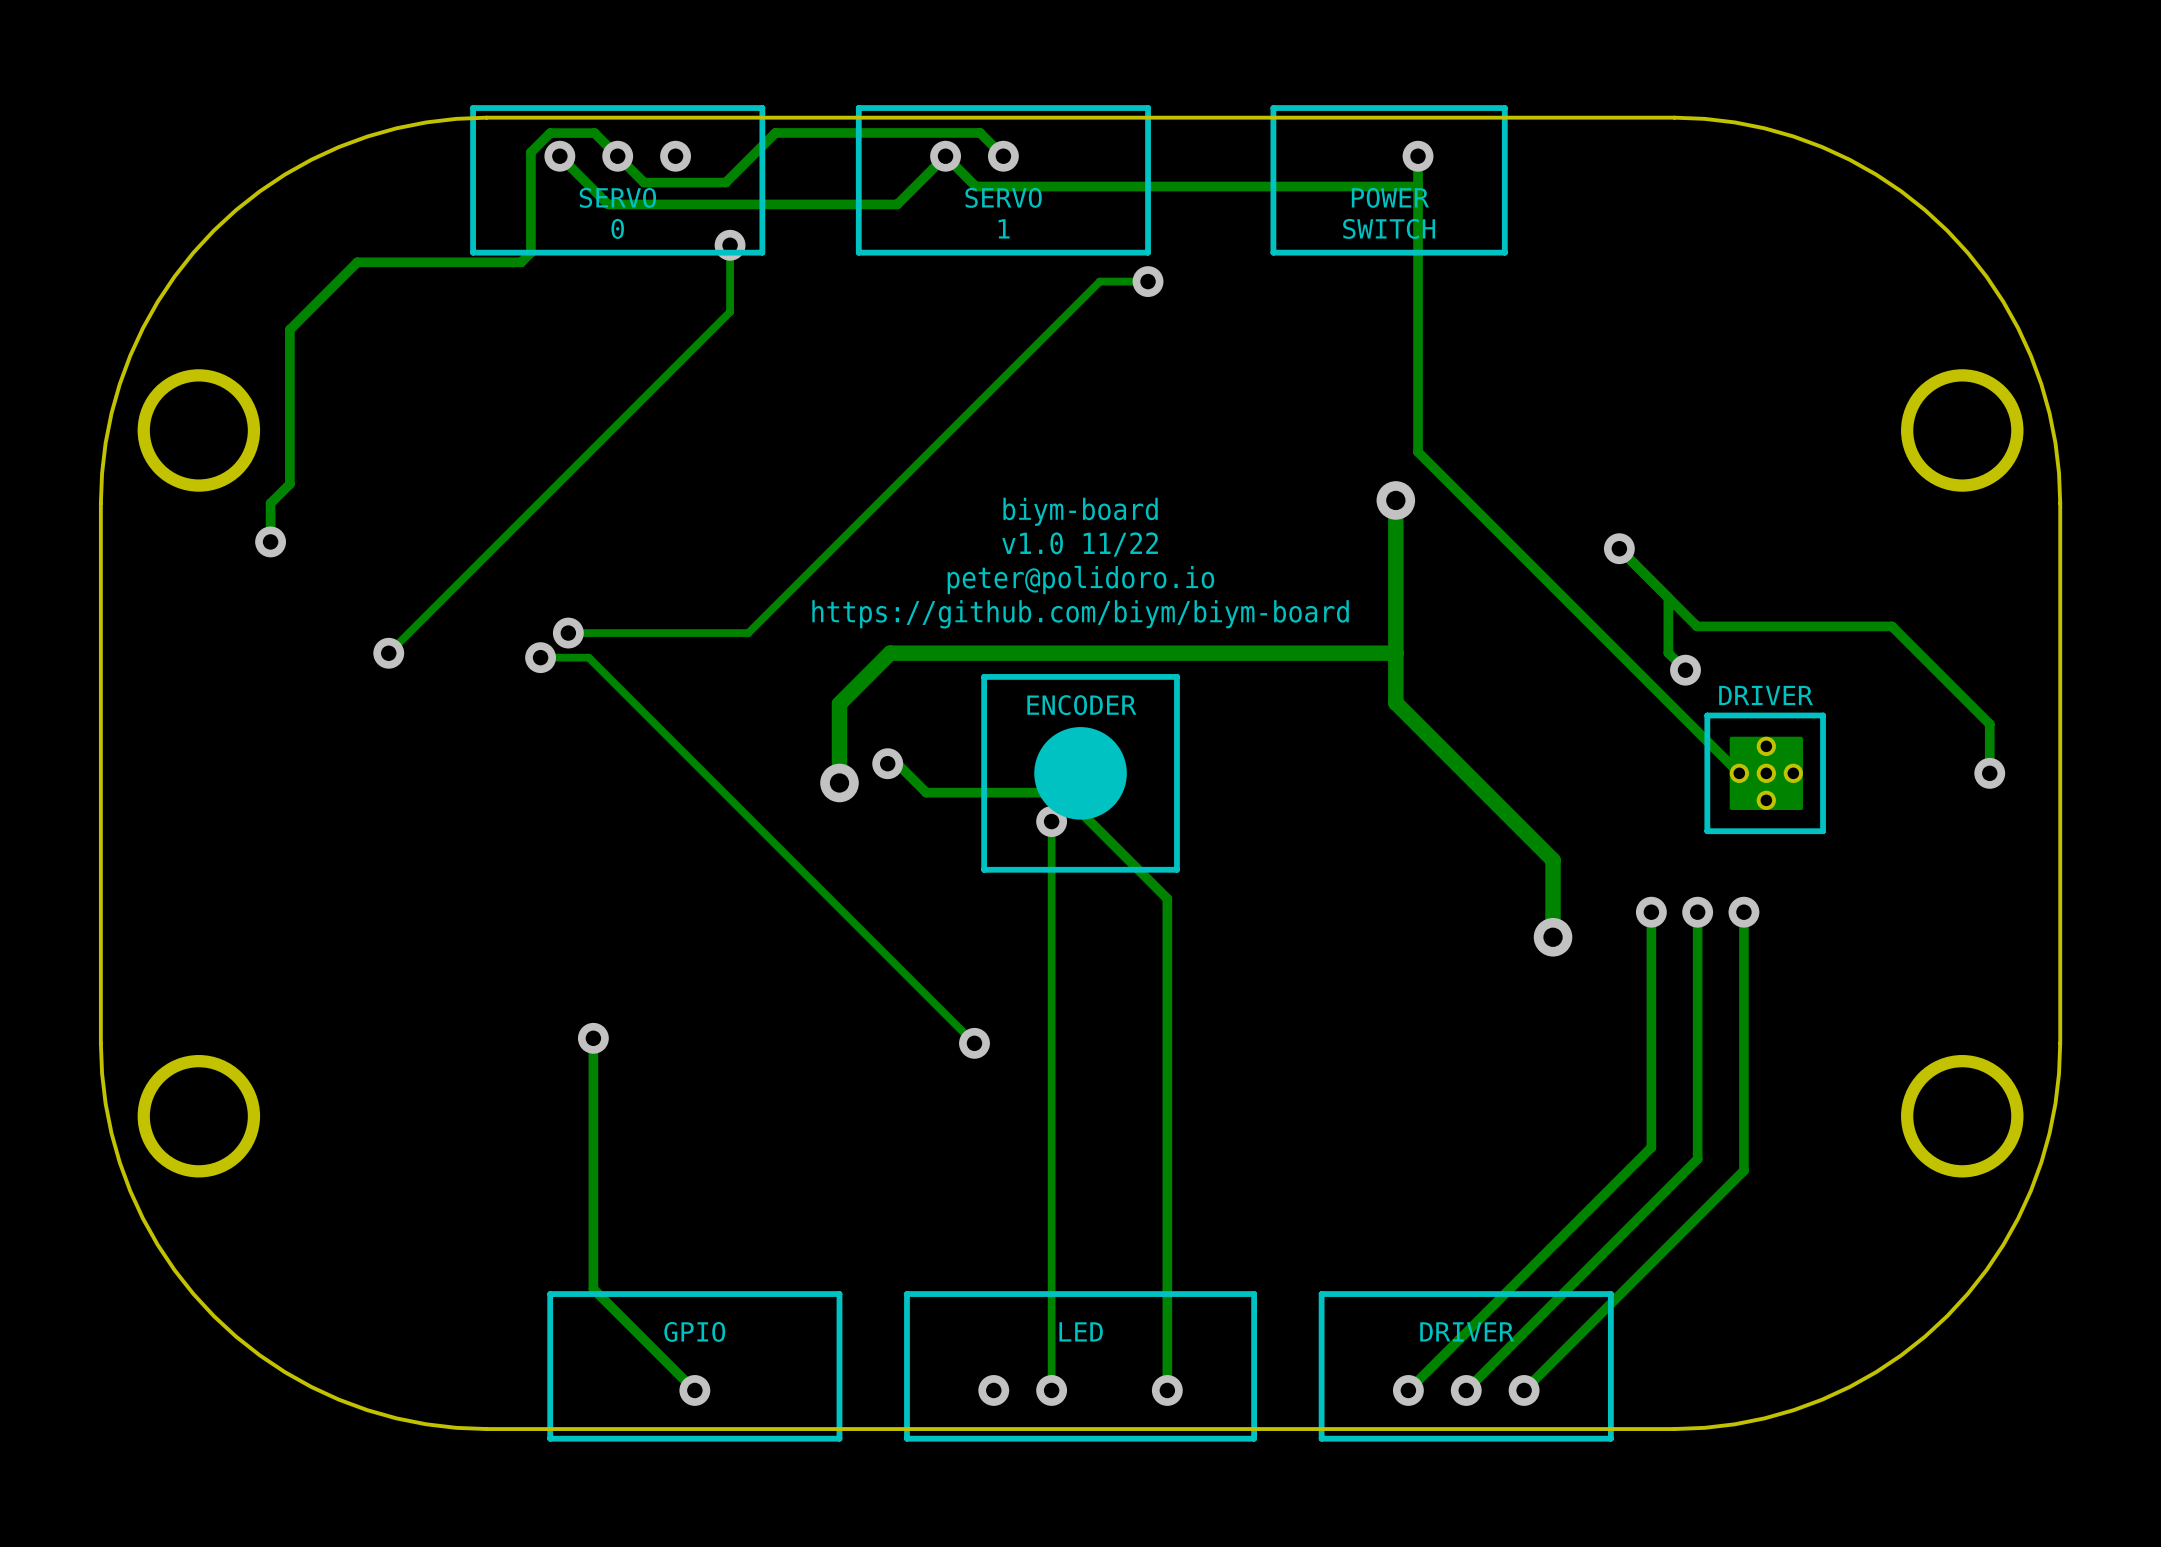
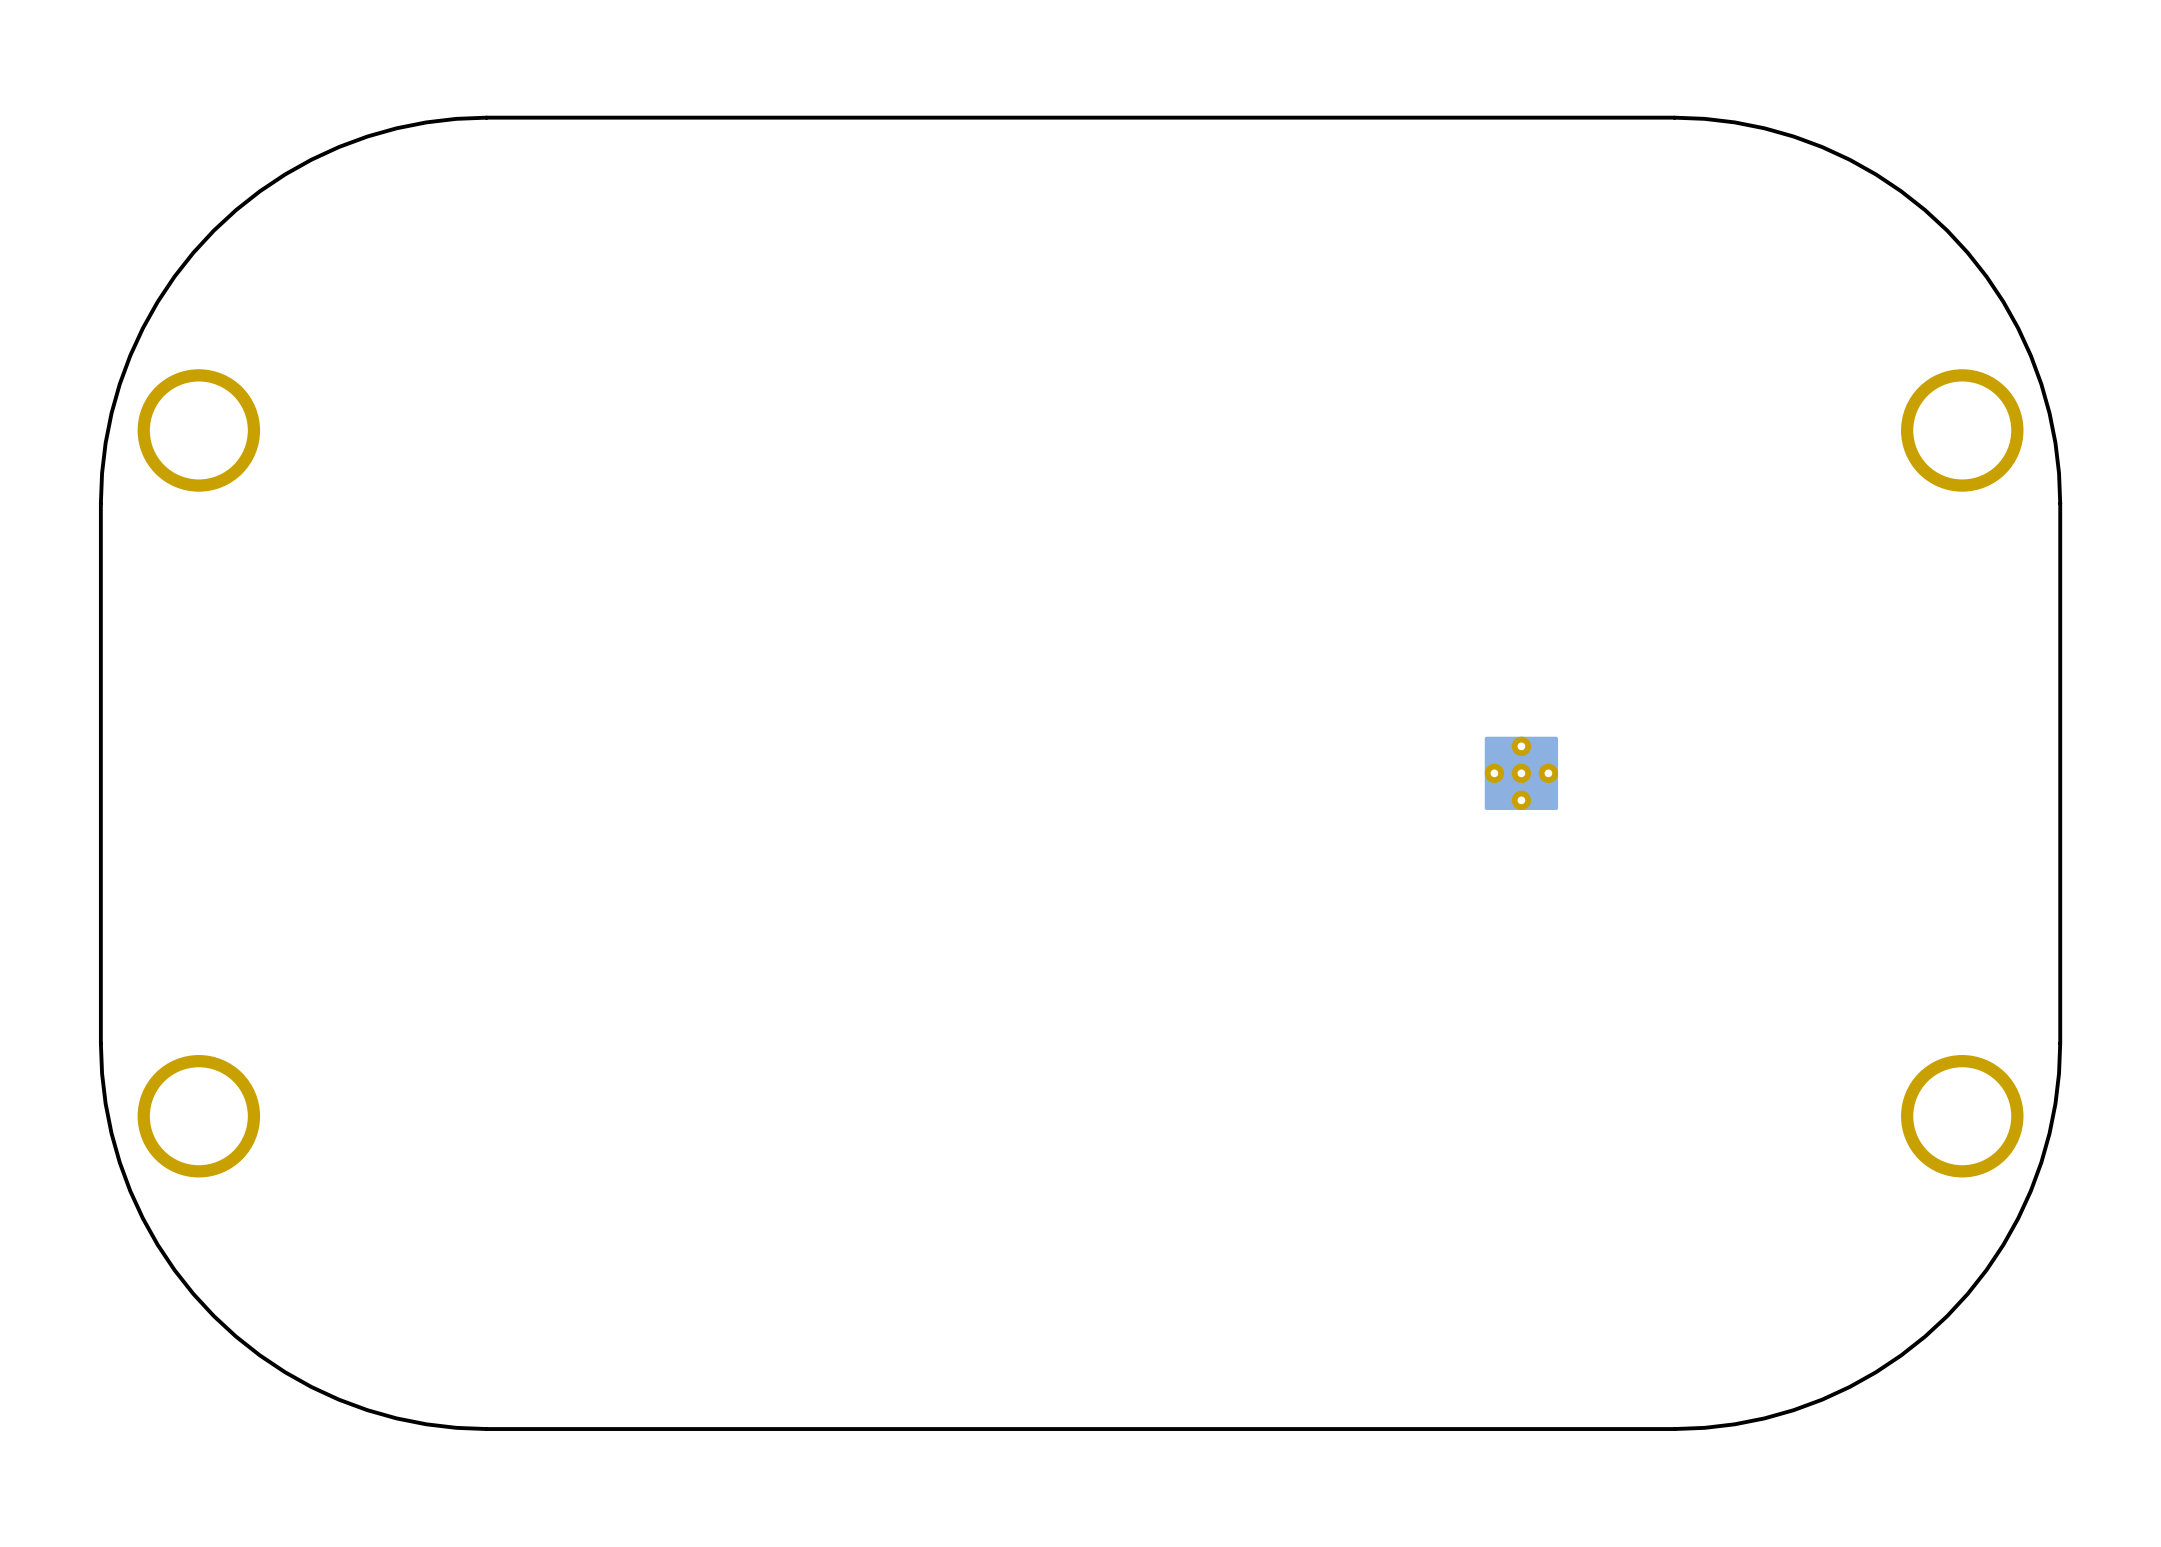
line: (762, 108) (473, 108) (473, 252) (762, 252) (762, 108) -> none
line: (1148, 108) (858, 108) (858, 252) (1148, 252) (1148, 108) -> none
line: (1504, 108) (1273, 108) (1273, 252) (1504, 252) (1504, 108) -> none
track: (559, 156) (608, 204) (897, 204) (945, 156) (975, 186) (1418, 186) -> none
via: (559, 156) -> none
via: (617, 156) -> none
via: (675, 156) -> none
via: (945, 156) -> none
track: (1003, 156) (980, 132) (775, 132) (725, 182) (644, 182) (594, 133) (550, 133) (530, 152) (530, 252) (521, 262) (357, 262) (289, 329) (289, 484) (270, 503) (270, 541) -> none
via: (1003, 156) -> none
track: (1418, 156) (1418, 452) (1739, 773) -> none
via: (1418, 156) -> none
text: SERVO (617, 197) -> none
text: SERVO (1003, 197) -> none
text: POWER (1390, 197) -> none
text: 0 (617, 228) -> none
text: 1 (1004, 228) -> none
text: SWITCH (1389, 228) -> none
track: (730, 245) (730, 311) (388, 653) -> none
via: (730, 245) -> none
track: (1148, 281) (1099, 281) (748, 633) (568, 633) -> none
via: (1148, 281) -> none
track: (1395, 500) (1395, 702) (1553, 860) (1553, 937) -> none
via: (1395, 500) -> none
text: biym-board (1080, 511) -> none
via: (270, 541) -> none
text: v1.0 11/22 (1080, 544) -> none
track: (1619, 548) (1697, 626) (1892, 626) (1989, 724) (1989, 773) -> none
via: (1619, 548) -> none
text: peter@polidoro.io (1080, 580) -> none
track: (1668, 597) (1668, 653) (1685, 670) -> none
text: https://github.com/biym/biym-board (1080, 614) -> none
via: (568, 633) -> none
via: (388, 653) -> none
track: (1395, 653) (890, 653) (839, 703) (839, 782) -> none
track: (540, 657) (588, 657) (974, 1043) -> none
via: (540, 657) -> none
via: (1685, 670) -> none
line: (1176, 676) (984, 676) (984, 869) (1176, 869) (1176, 676) -> none
text: DRIVER (1766, 695) -> none
text: ENCODER (1081, 705) -> none
line: (1823, 715) (1707, 715) (1707, 831) (1823, 831) (1823, 715) -> none
drawing: [1034, 727, 1127, 820] -> none
track: (887, 763) (897, 763) (926, 792) (1061, 792) (1167, 898) (1167, 1390) -> none
via: (887, 763) -> none
part: none -> (1521, 773)
part: (1766, 773) -> none
via: (1989, 773) -> none
via: (839, 782) -> none
track: (1051, 821) (1051, 1390) -> none
via: (1051, 821) -> none
track: (1651, 912) (1651, 1147) (1408, 1390) -> none
via: (1651, 912) -> none
track: (1697, 912) (1697, 1159) (1466, 1390) -> none
via: (1697, 912) -> none
track: (1743, 912) (1743, 1170) (1524, 1390) -> none
via: (1743, 912) -> none
via: (1553, 937) -> none
track: (593, 1038) (593, 1289) (694, 1390) -> none
via: (593, 1038) -> none
via: (974, 1043) -> none
line: (839, 1294) (550, 1294) (550, 1438) (839, 1438) (839, 1294) -> none
line: (1254, 1294) (906, 1294) (906, 1438) (1254, 1438) (1254, 1294) -> none
line: (1610, 1294) (1321, 1294) (1321, 1438) (1610, 1438) (1610, 1294) -> none
text: GPIO (694, 1331) -> none
text: LED (1081, 1331) -> none
text: DRIVER (1467, 1331) -> none
via: (694, 1390) -> none
via: (993, 1390) -> none
via: (1051, 1390) -> none
via: (1167, 1390) -> none
via: (1408, 1390) -> none
via: (1466, 1390) -> none
via: (1524, 1390) -> none

